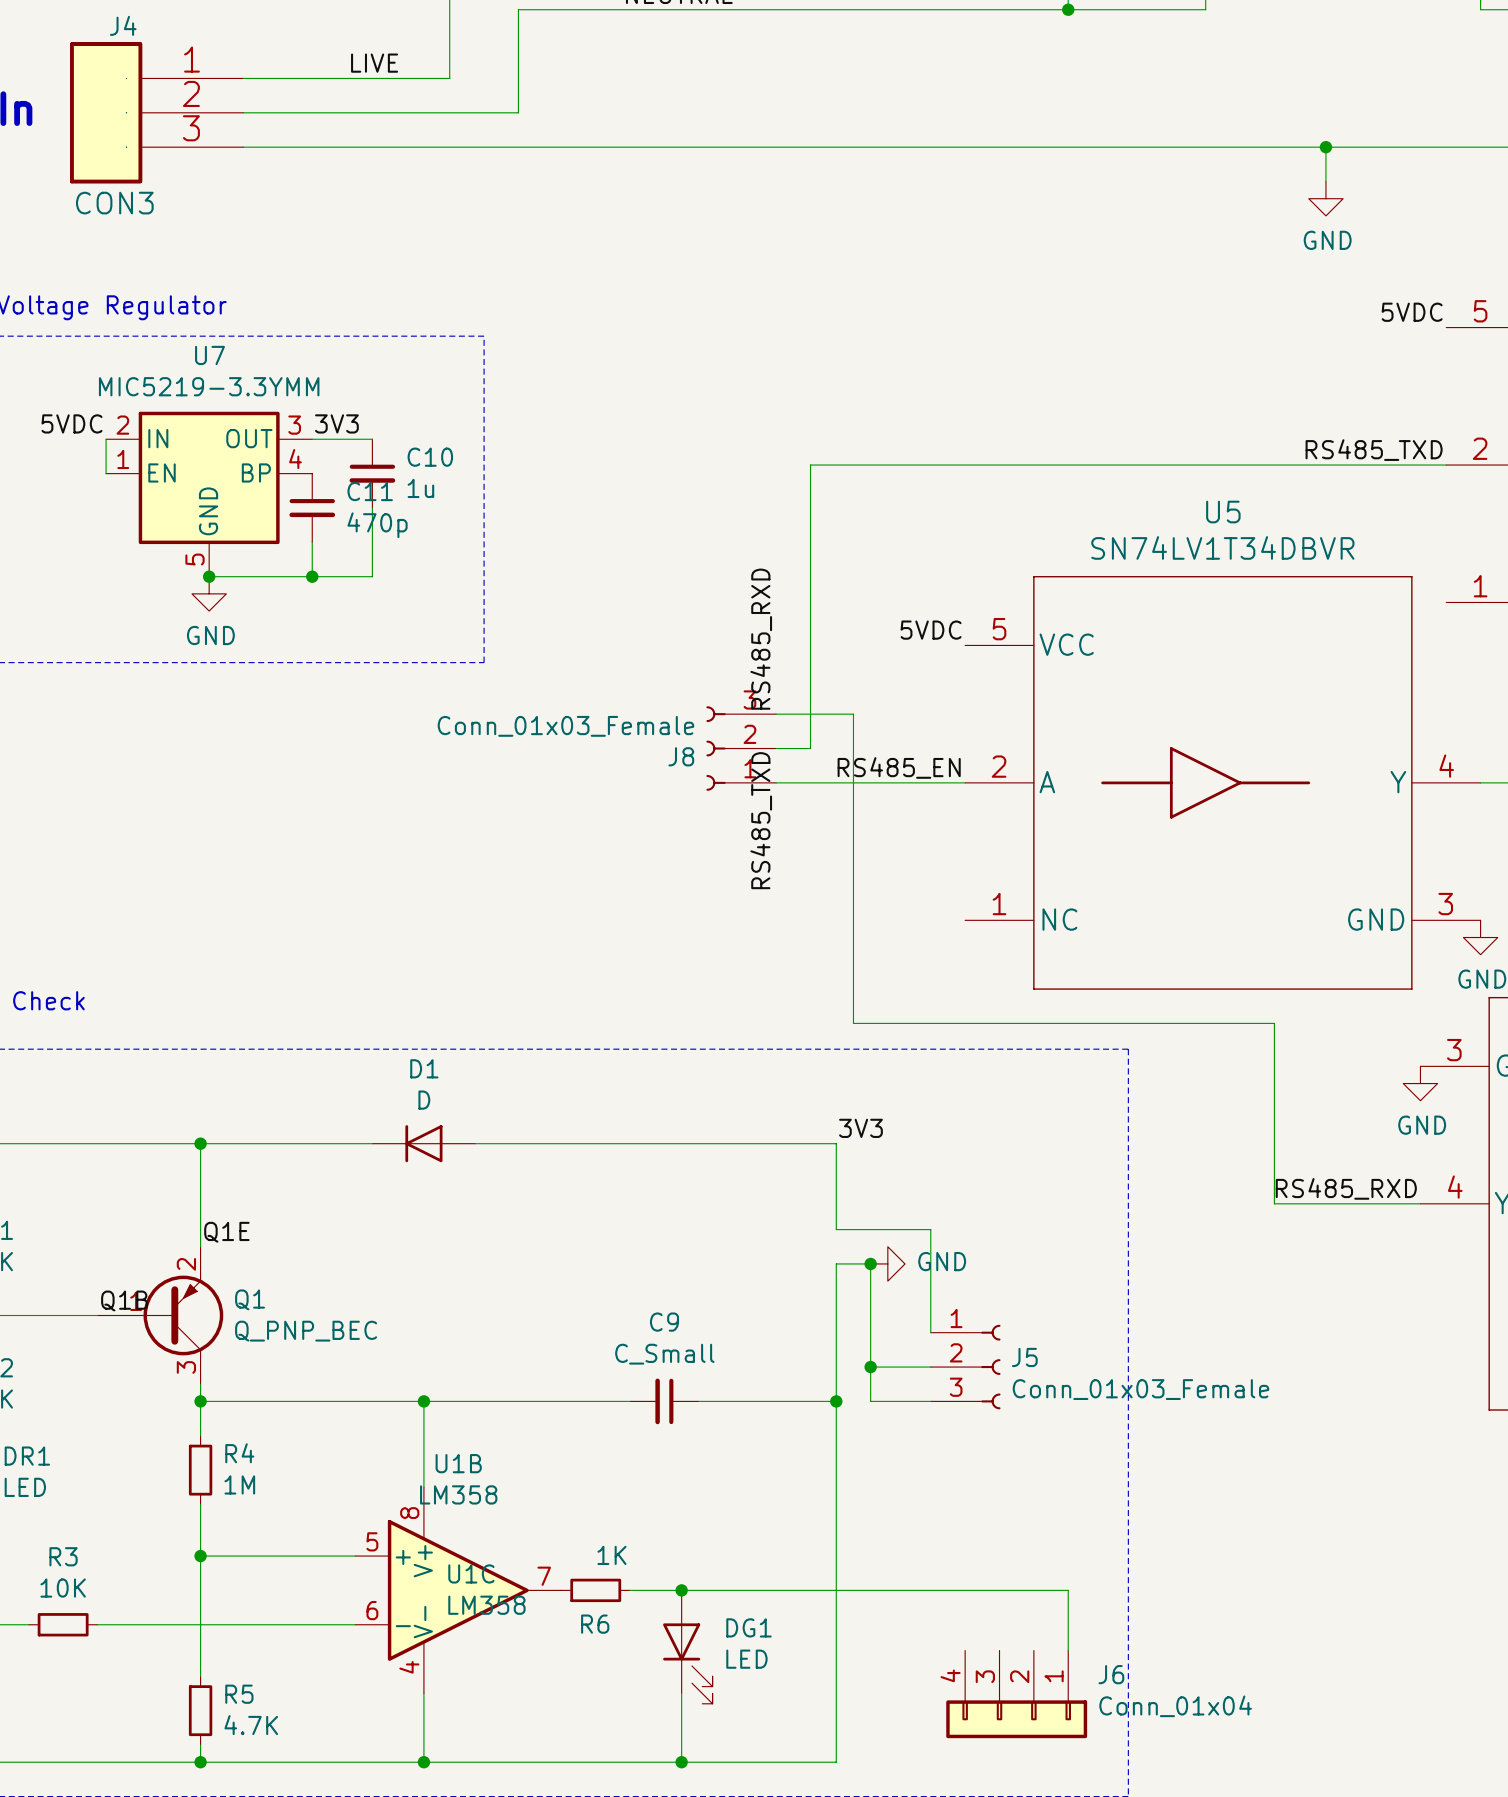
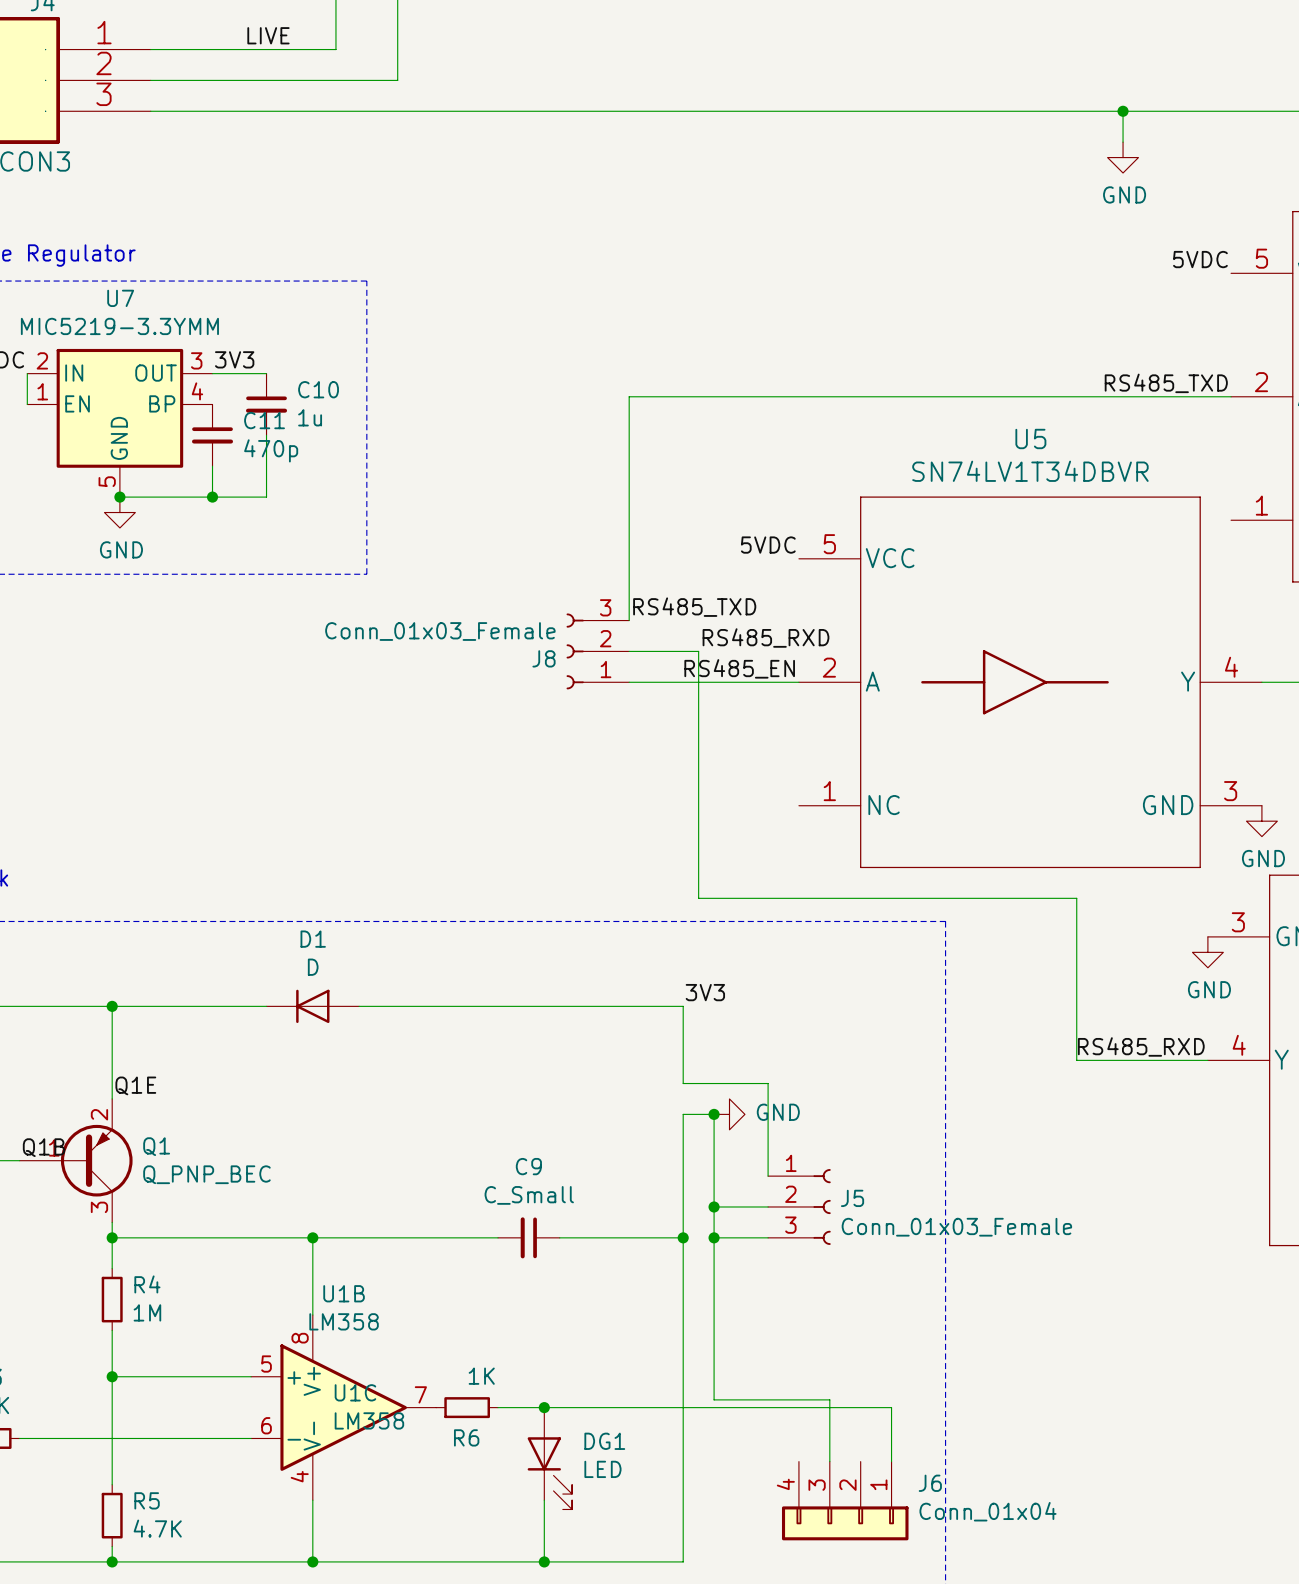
wire: (810, 465) (810, 748) -> (660, 396) (629, 396) (629, 620)
label rotation: 0° (761, 639) -> 90° clockwise (765, 638)
label position: RS485_RXD (761, 639) -> RS485_RXD (765, 638)
wire: (776, 714) (853, 714) (853, 748) -> (660, 651) (698, 651)
label rotation: 0° (761, 820) -> 90° clockwise (694, 607)
wire: none -> (714, 1237) (714, 1399) (829, 1399) (829, 1461)
junction: none -> (714, 1237)

